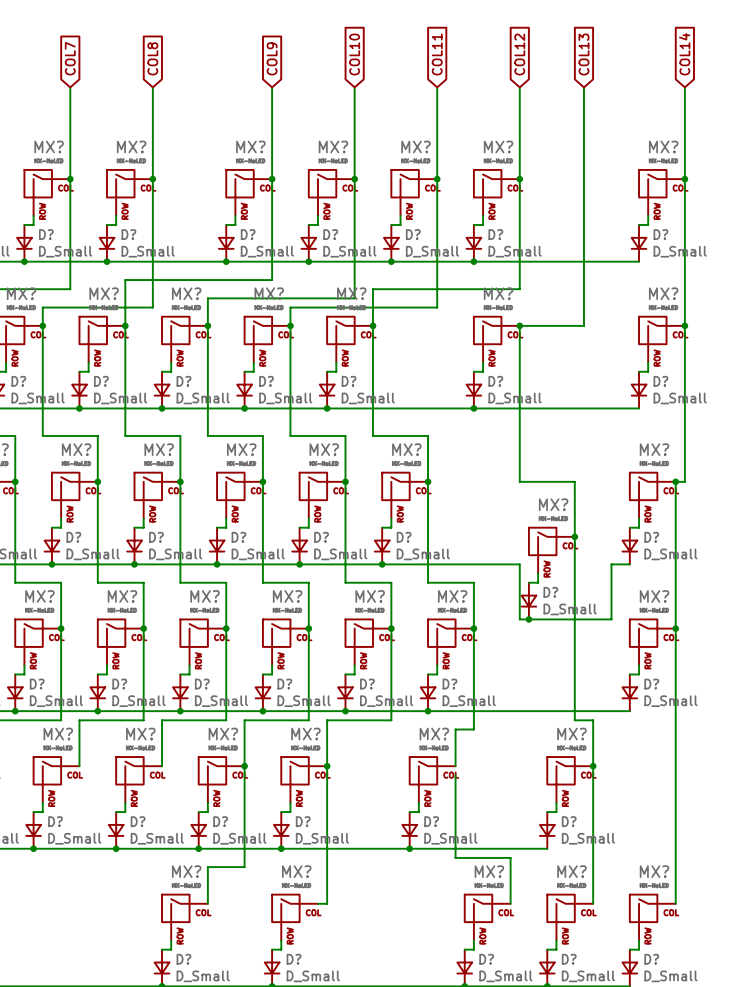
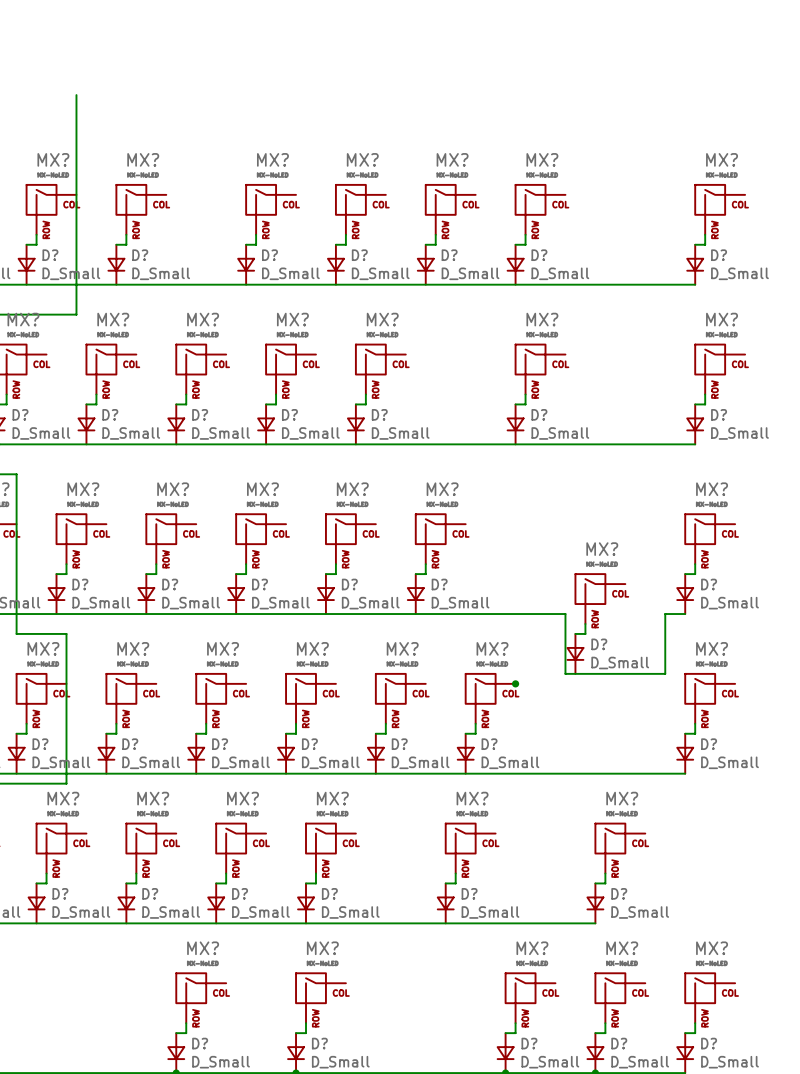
global label: COL10 (354, 54) -> none
global label: COL11 (437, 54) -> none
global label: COL12 (519, 54) -> none
global label: COL13 (583, 54) -> none
global label: COL14 (684, 54) -> none
global label: COL7 (70, 58) -> none
global label: COL8 (152, 58) -> none
global label: COL9 (272, 58) -> none
wire: (152, 87) (152, 307) (42, 307) (42, 435) (97, 435) (97, 582) (143, 582) (143, 720) (79, 720) (79, 766) -> none
wire: (272, 87) (272, 280) (125, 280) (125, 435) (180, 435) (180, 582) (226, 582) (226, 720) (162, 720) (162, 766) -> none
wire: (354, 87) (354, 298) (207, 298) (207, 435) (262, 435) (262, 582) (308, 582) (308, 720) (244, 720) (244, 867) (207, 867) (207, 903) -> none
wire: (437, 87) (437, 307) (290, 307) (290, 435) (345, 435) (345, 582) (391, 582) (391, 720) (327, 720) (327, 903) (317, 903) -> none
wire: (519, 87) (519, 289) (373, 289) (373, 435) (428, 435) (428, 582) (473, 582) (473, 729) (455, 729) (455, 766) -> none
wire: (583, 87) (583, 325) (519, 325) (519, 481) (574, 481) (574, 720) (593, 720) (593, 903) -> none
wire: (684, 87) (684, 481) (675, 481) (675, 903) -> none
junction: (70, 179) -> none
junction: (152, 179) -> none
junction: (272, 179) -> none
junction: (354, 179) -> none
junction: (437, 179) -> none
junction: (519, 179) -> none
junction: (684, 179) -> none
junction: (24, 261) -> none
junction: (106, 261) -> none
junction: (226, 261) -> none
junction: (308, 261) -> none
junction: (391, 261) -> none
junction: (473, 261) -> none
junction: (42, 325) -> none
junction: (125, 325) -> none
junction: (207, 325) -> none
junction: (290, 325) -> none
junction: (373, 325) -> none
junction: (519, 325) -> none
junction: (684, 325) -> none
junction: (79, 408) -> none
junction: (162, 408) -> none
junction: (244, 408) -> none
junction: (327, 408) -> none
junction: (473, 408) -> none
junction: (15, 481) -> none
junction: (97, 481) -> none
junction: (180, 481) -> none
junction: (262, 481) -> none
junction: (345, 481) -> none
junction: (428, 481) -> none
junction: (675, 481) -> none
junction: (574, 536) -> none
junction: (51, 564) -> none
junction: (134, 564) -> none
junction: (217, 564) -> none
junction: (299, 564) -> none
junction: (382, 564) -> none
junction: (528, 619) -> none
junction: (61, 628) -> none
junction: (143, 628) -> none
junction: (226, 628) -> none
junction: (308, 628) -> none
junction: (391, 628) -> none
junction: (675, 628) -> none
junction: (15, 711) -> none
junction: (97, 711) -> none
junction: (180, 711) -> none
junction: (262, 711) -> none
junction: (345, 711) -> none
junction: (428, 711) -> none
junction: (244, 766) -> none
junction: (327, 766) -> none
junction: (593, 766) -> none
wire: (455, 775) (455, 857) (510, 857) (510, 903) -> none
junction: (33, 848) -> none
junction: (116, 848) -> none
junction: (198, 848) -> none
junction: (281, 848) -> none
junction: (409, 848) -> none

